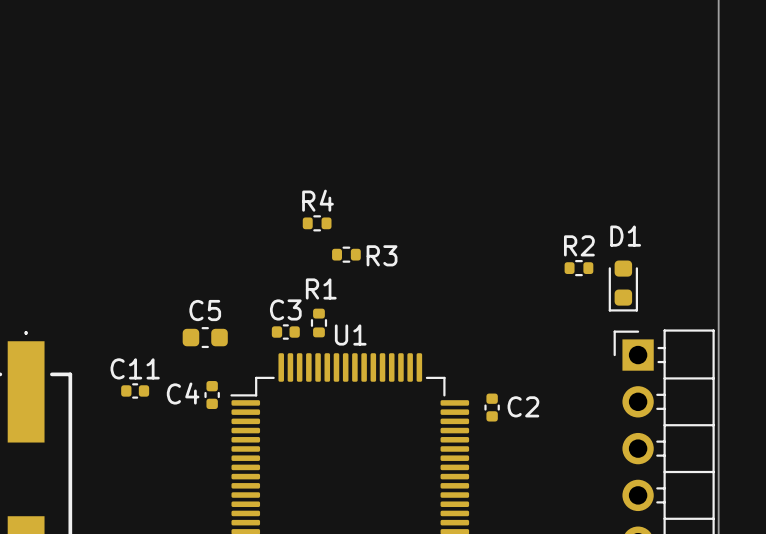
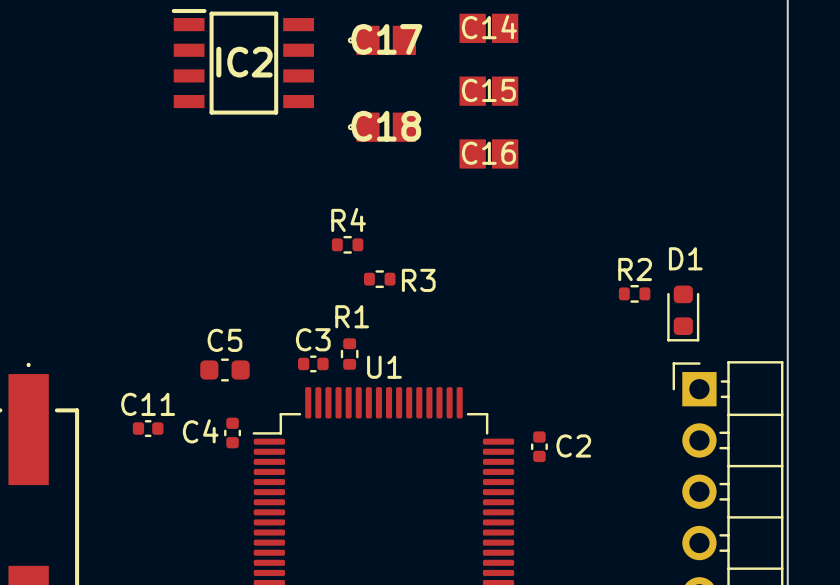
C14: none -> (488, 28)
C17: none -> (381, 40)
IC2: none -> (242, 61)
C15: none -> (488, 91)
C18: none -> (381, 127)
C16: none -> (488, 153)

